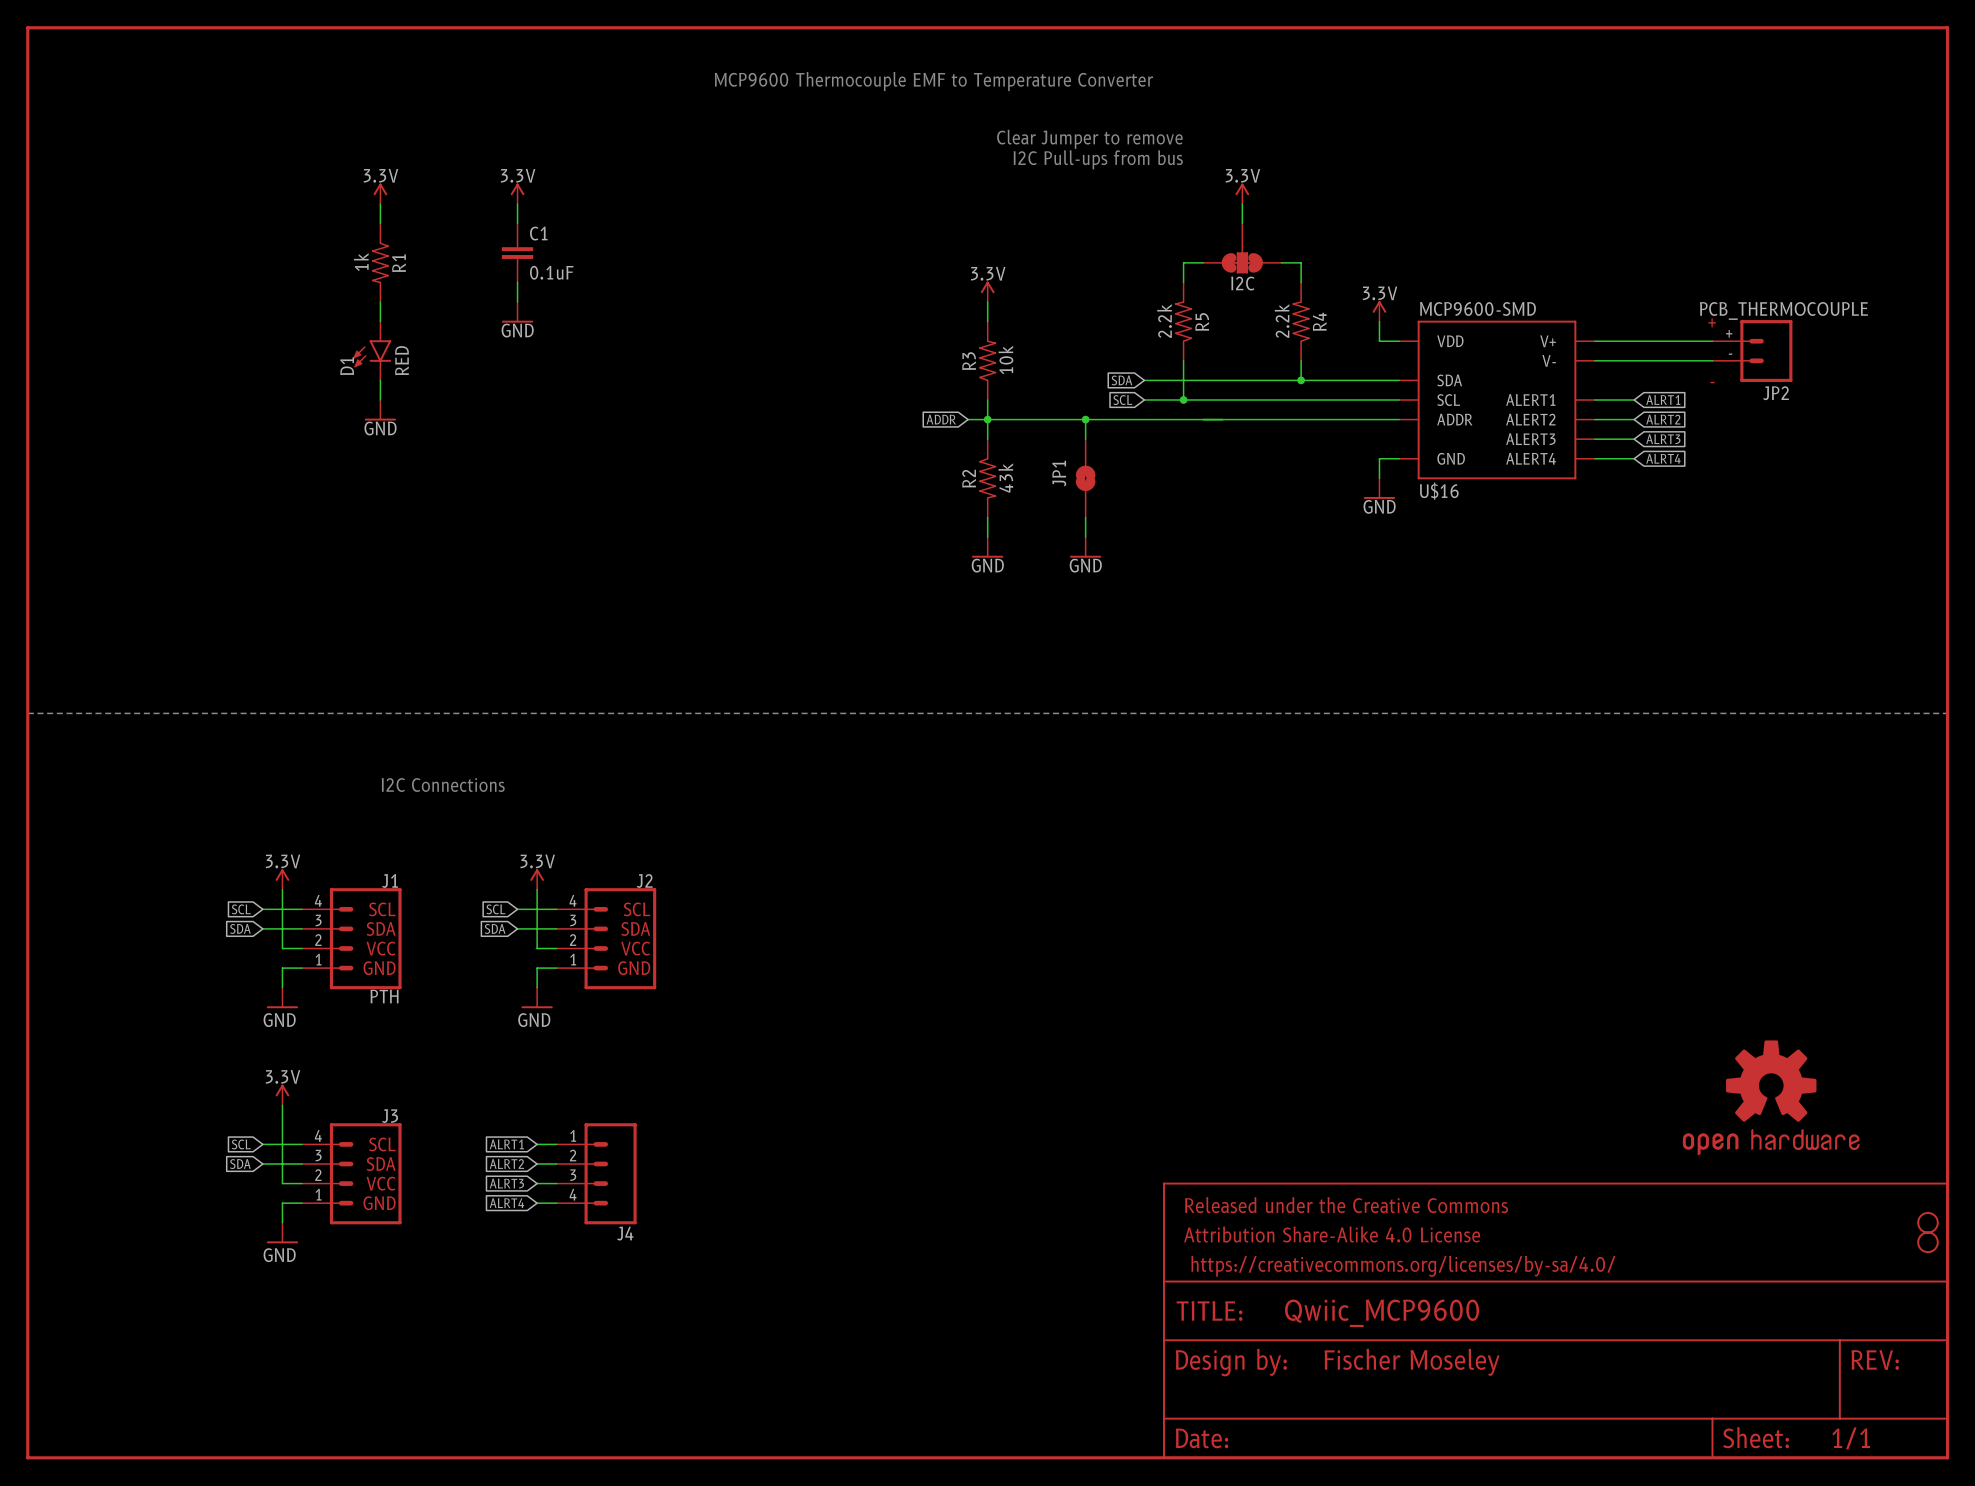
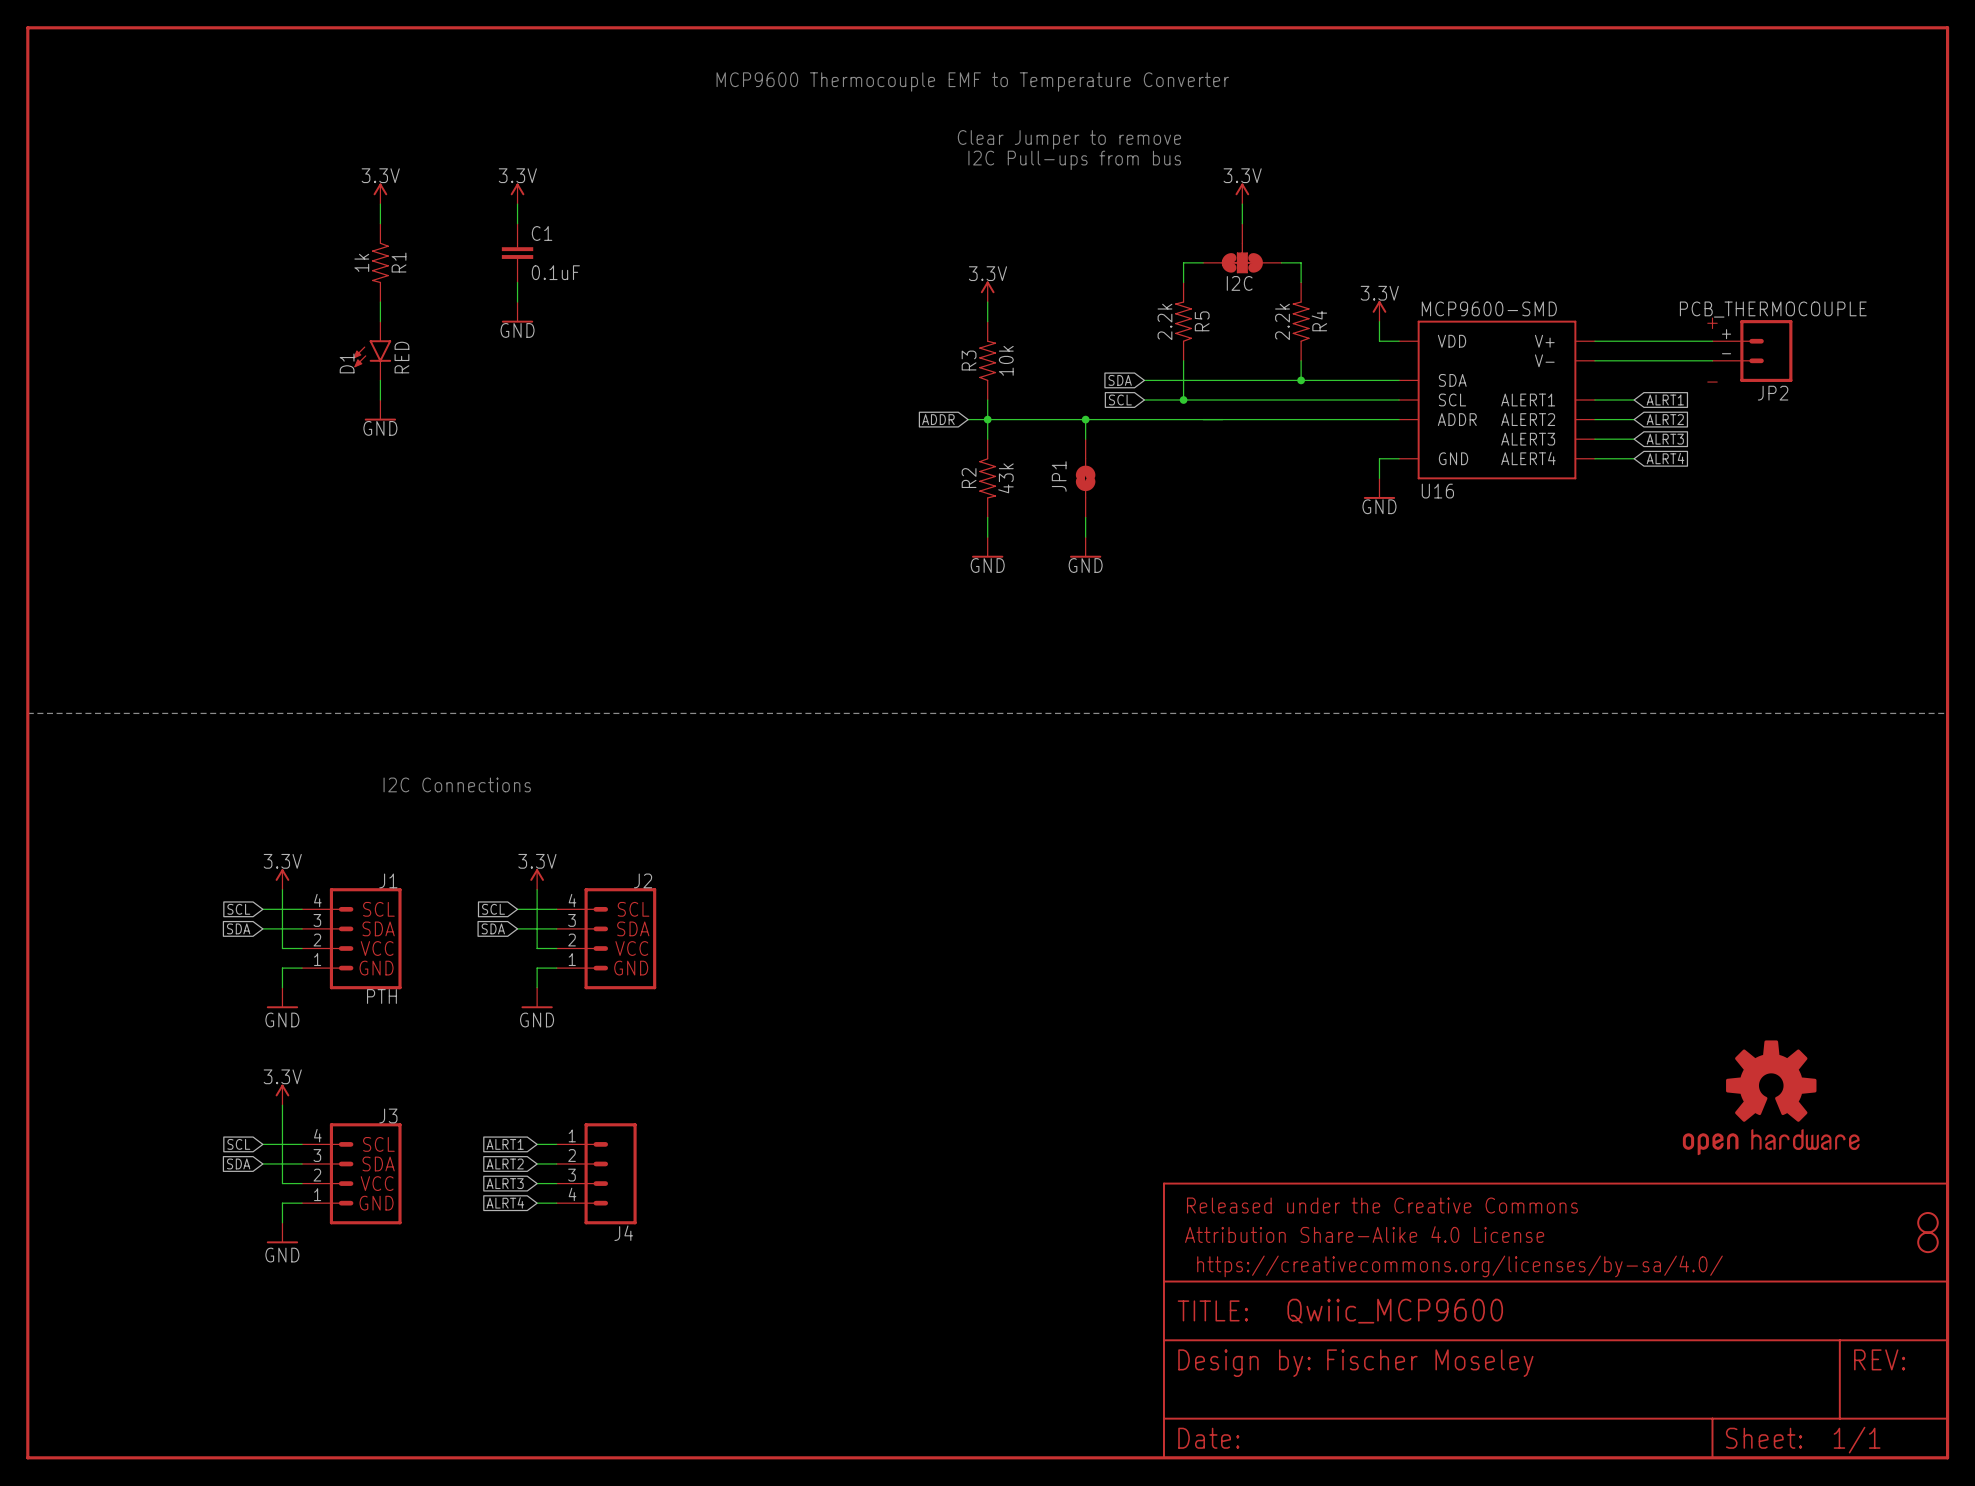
U$16 name: U$16 (1439, 491) -> U16 (1437, 491)

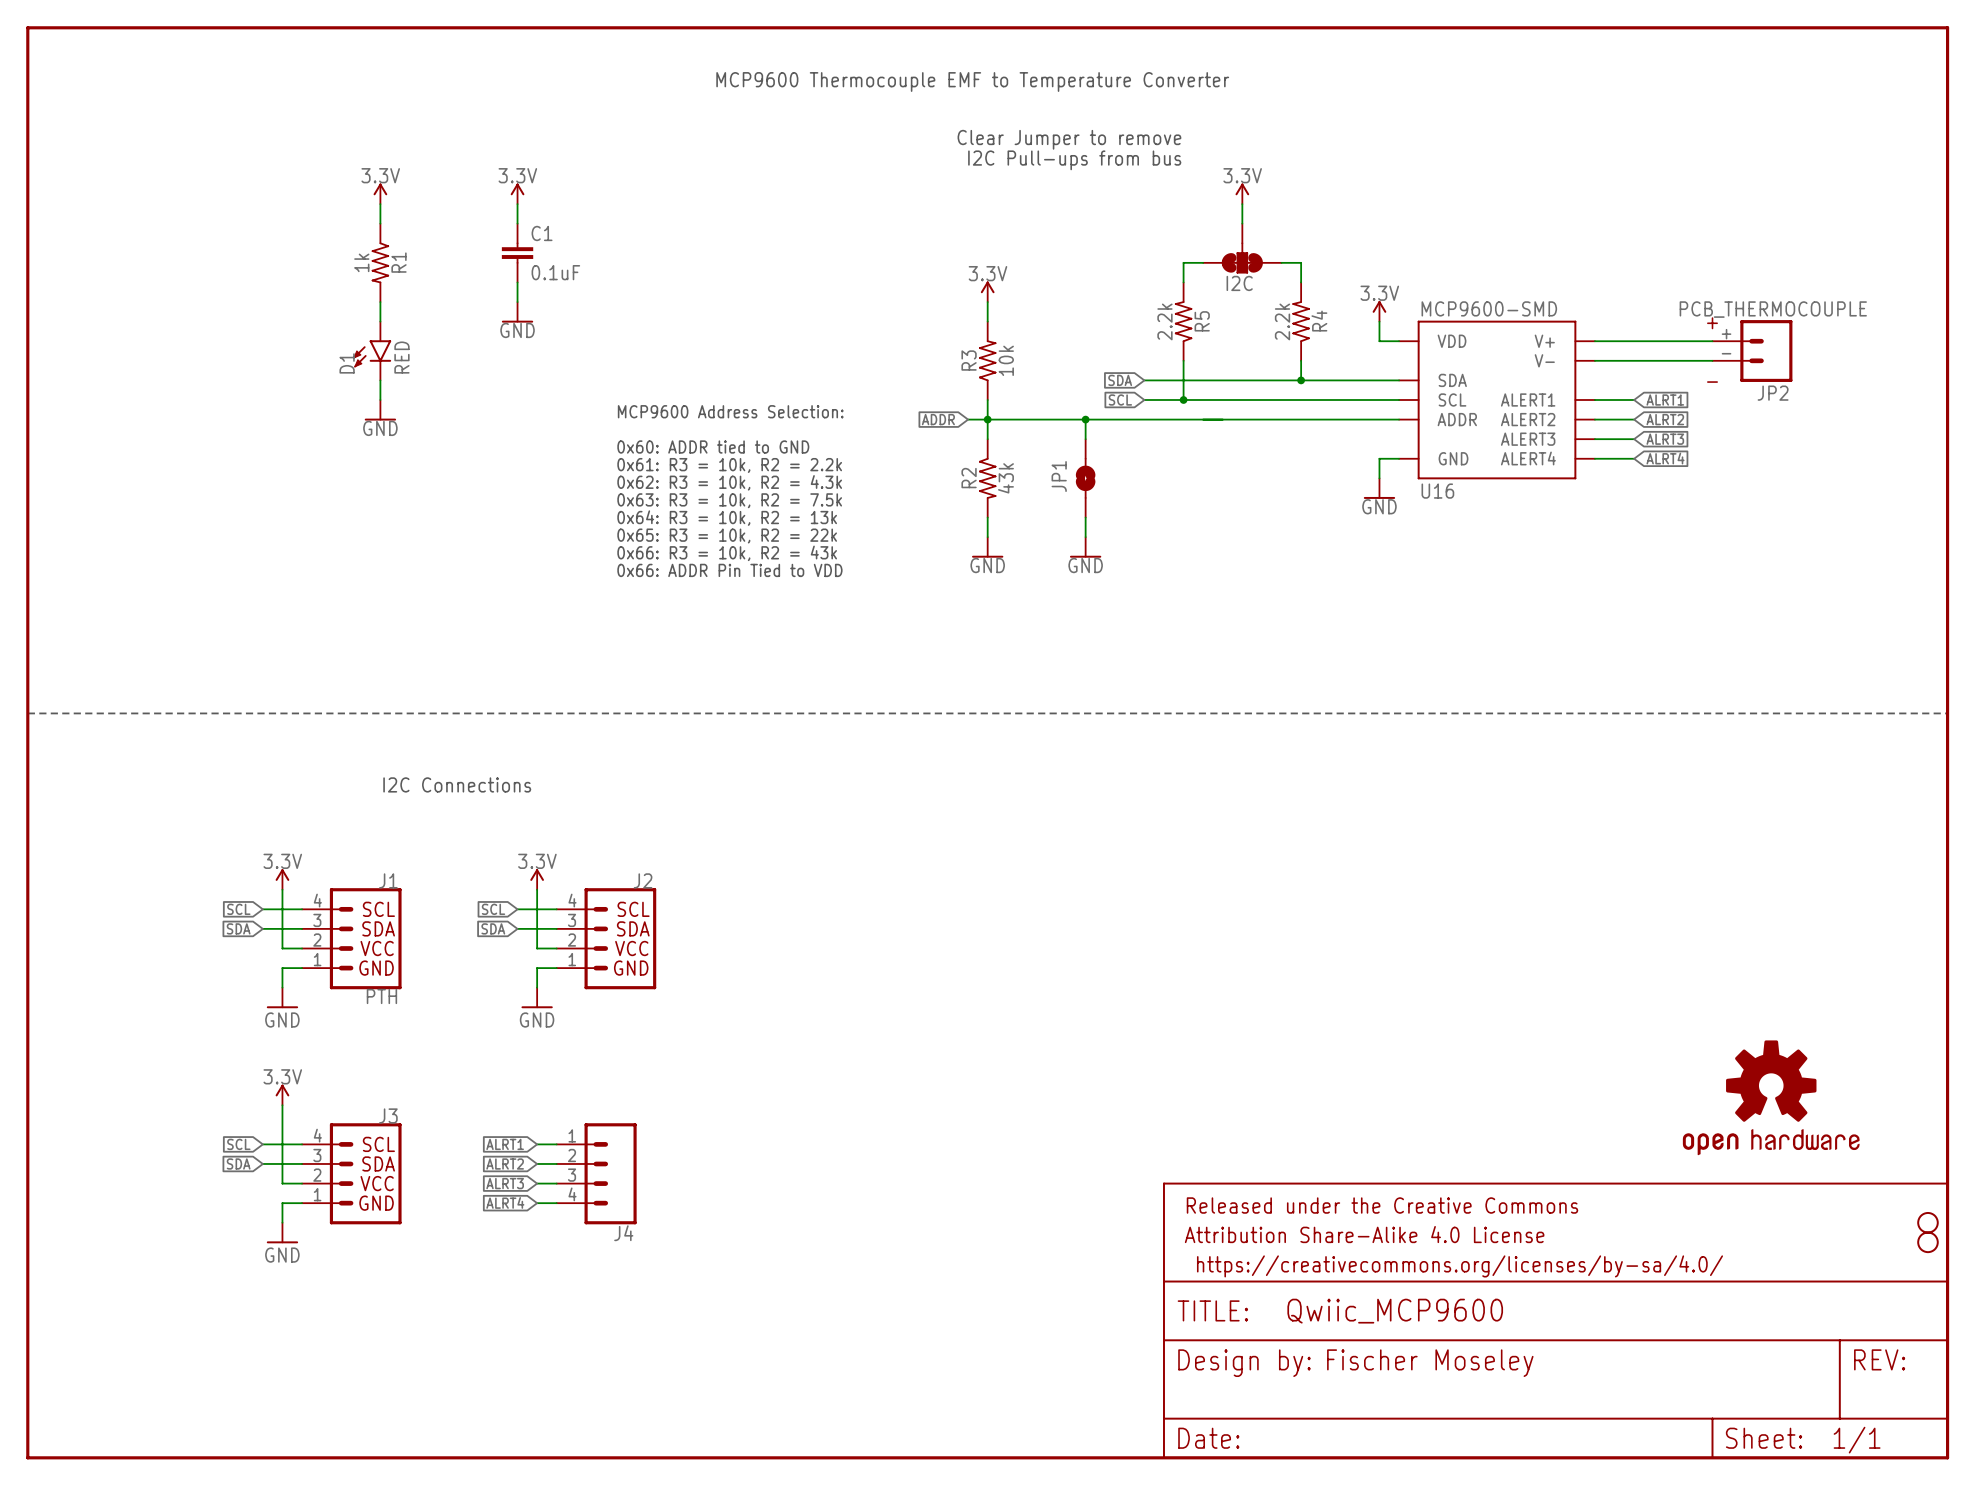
text: none -> MCP9600 Address Selection: (730, 411)
text: none -> 0x60: ADDR tied to GND (713, 447)
text: none -> 0x61: R3 = 10k, R2 = 2.2k (729, 465)
text: none -> 0x62: R3 = 10k, R2 = 4.3k (729, 482)
text: none -> 0x63: R3 = 10k, R2 = 7.5k (729, 500)
text: none -> 0x64: R3 = 10k, R2 = 13k (727, 518)
text: none -> 0x65: R3 = 10k, R2 = 22k (727, 536)
text: none -> 0x66: R3 = 10k, R2 = 43k (727, 553)
text: none -> 0x66: ADDR Pin Tied to VDD (729, 570)

